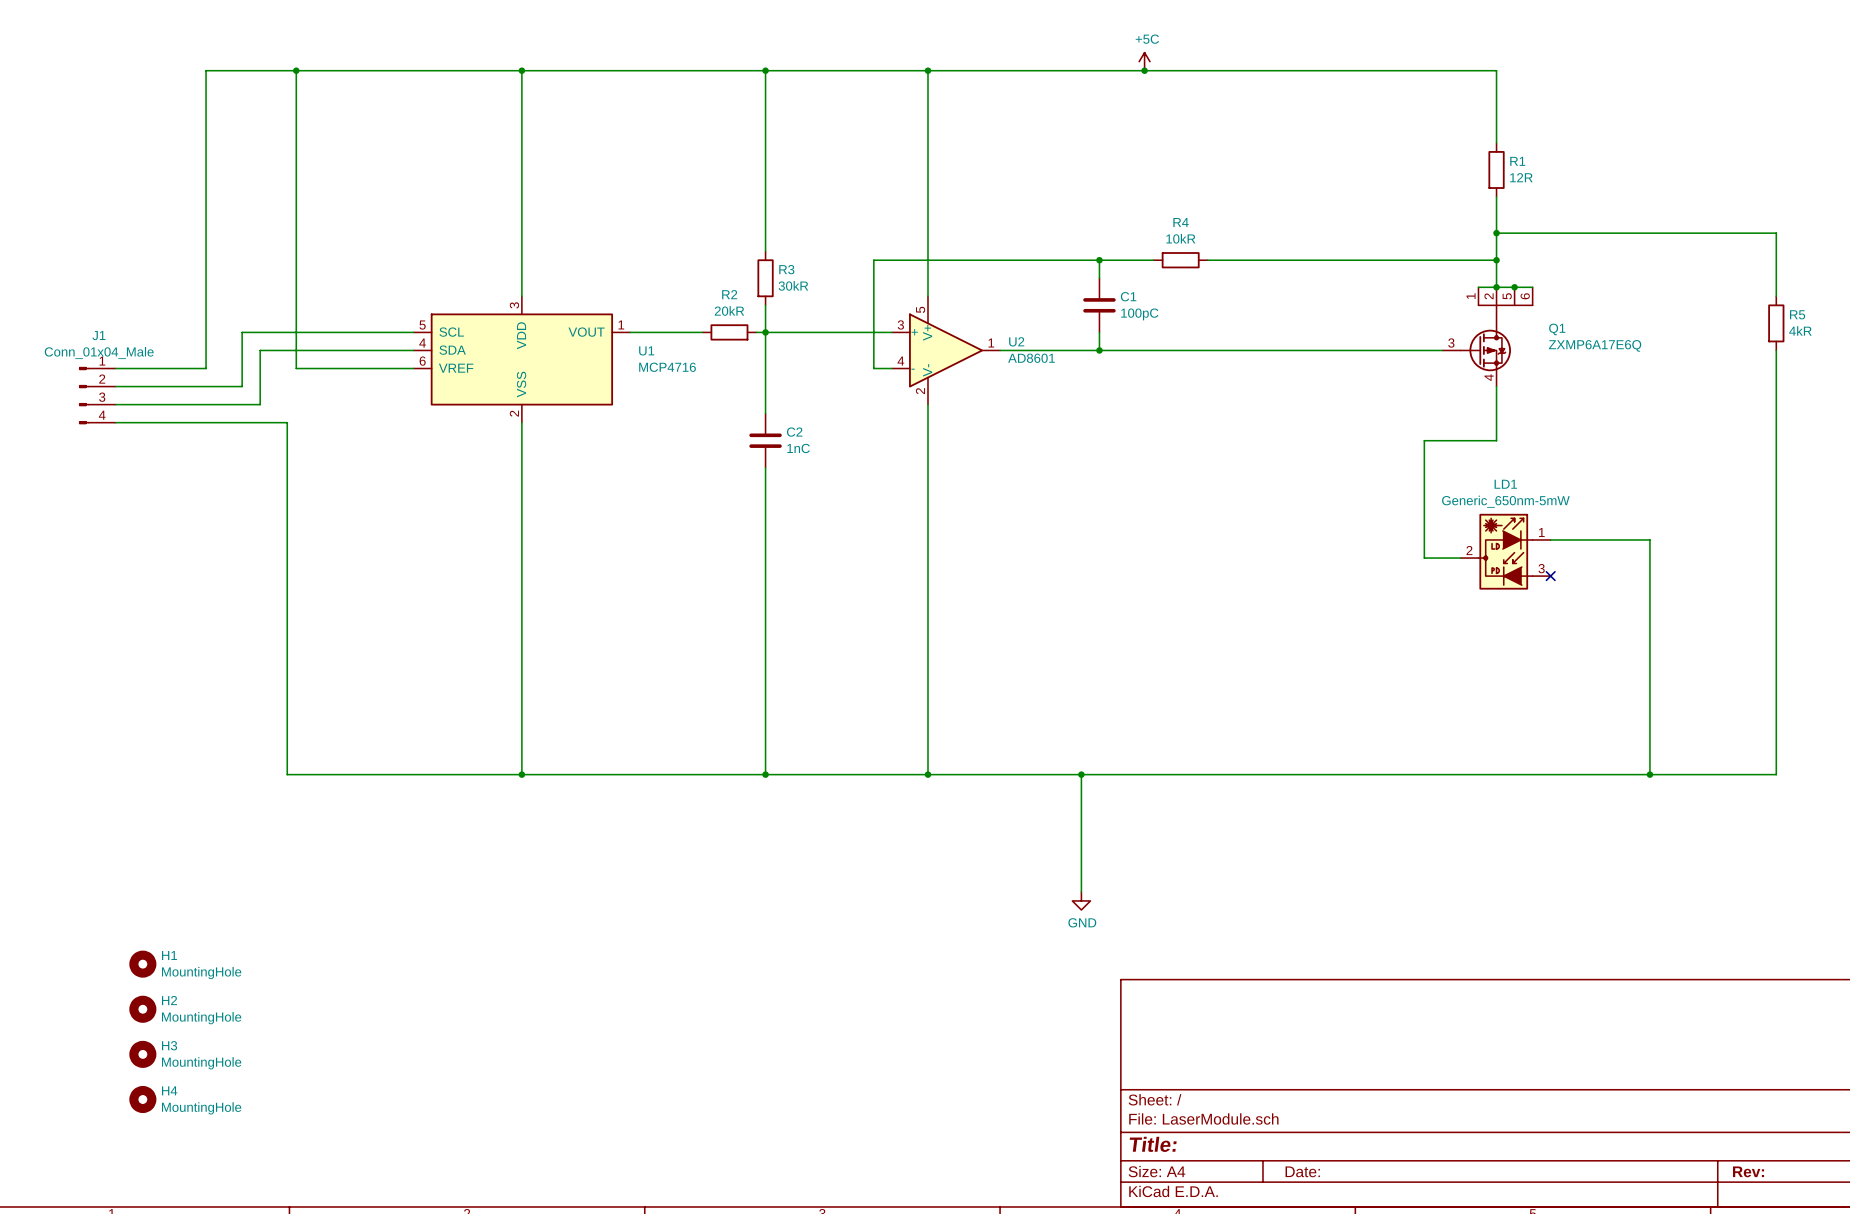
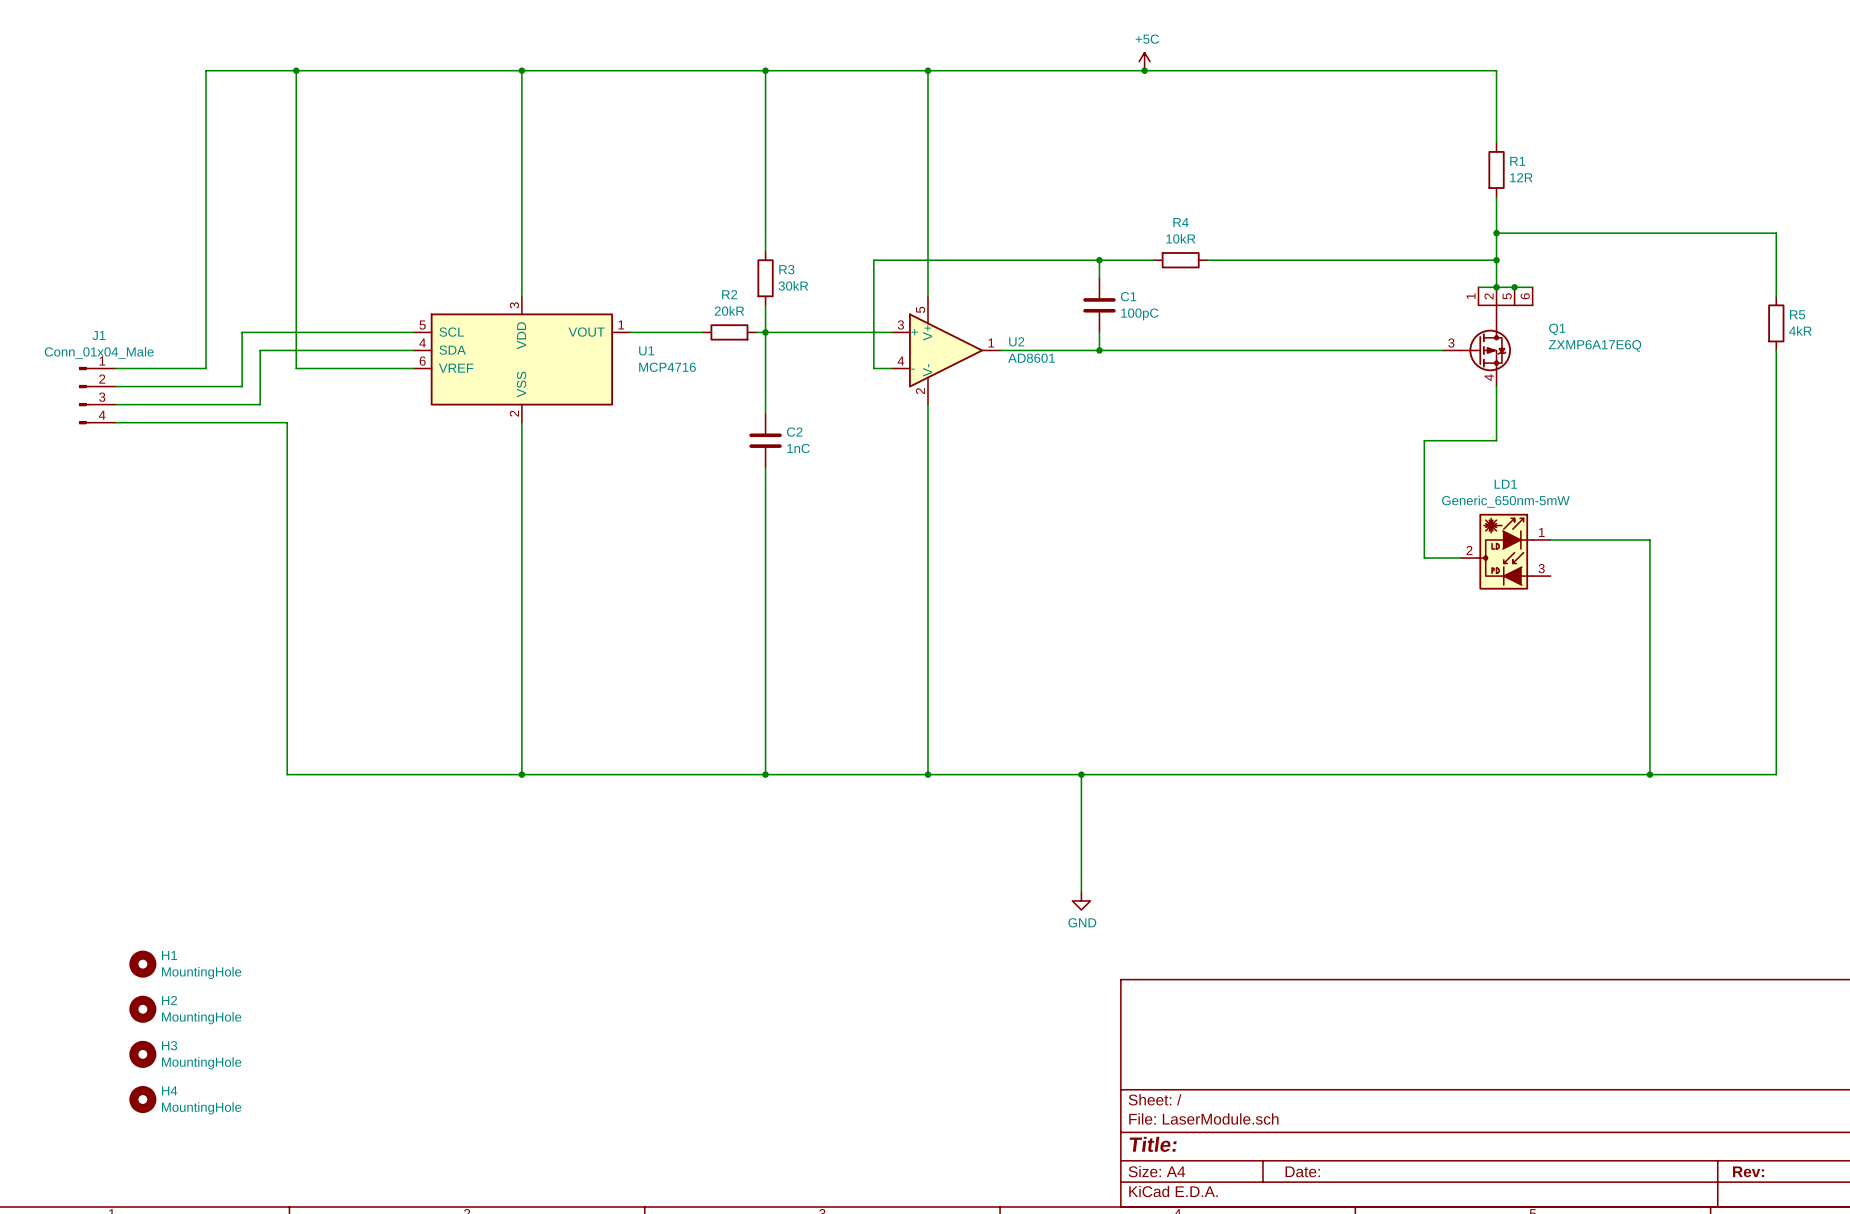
no-connect mark: (1550, 576) -> none

